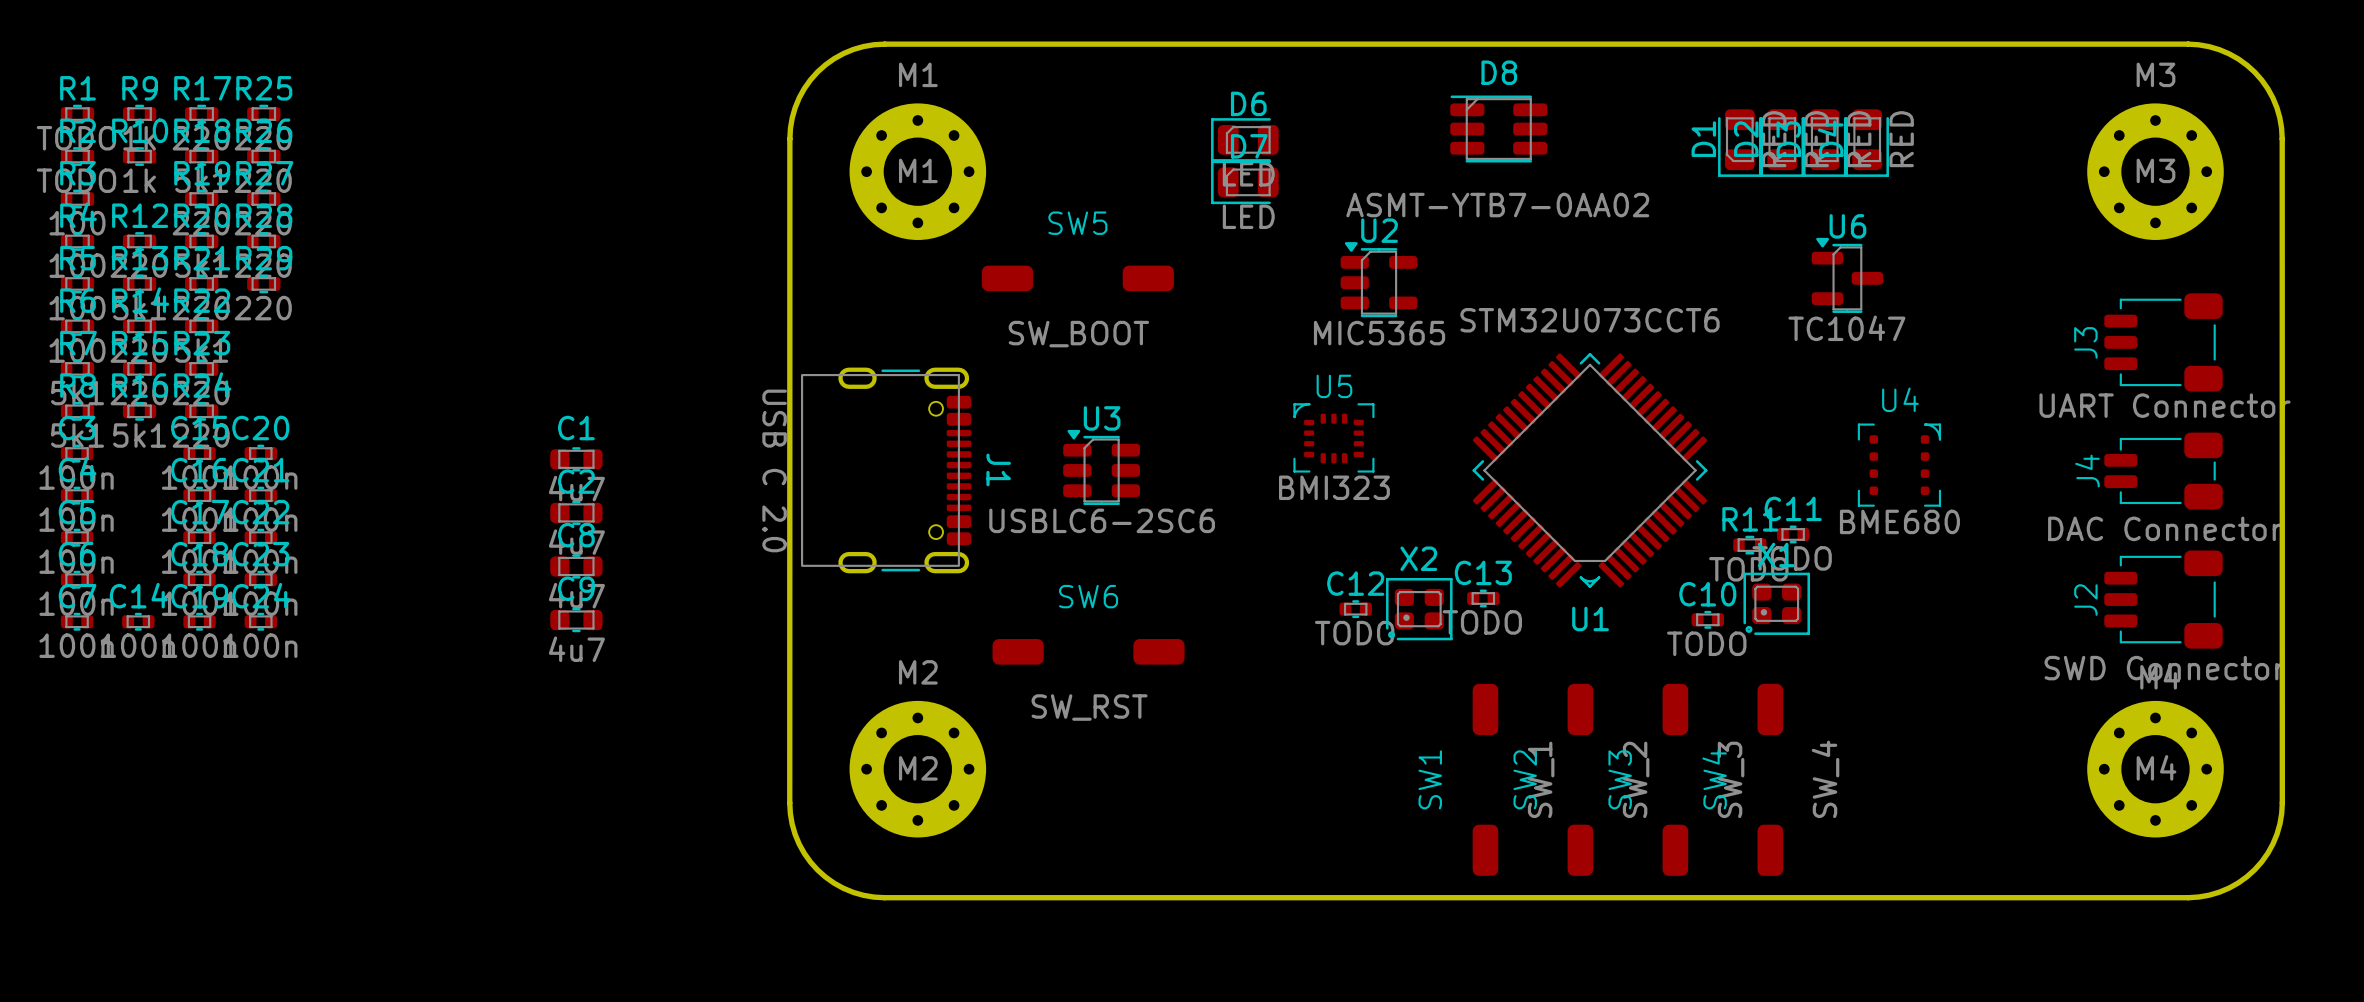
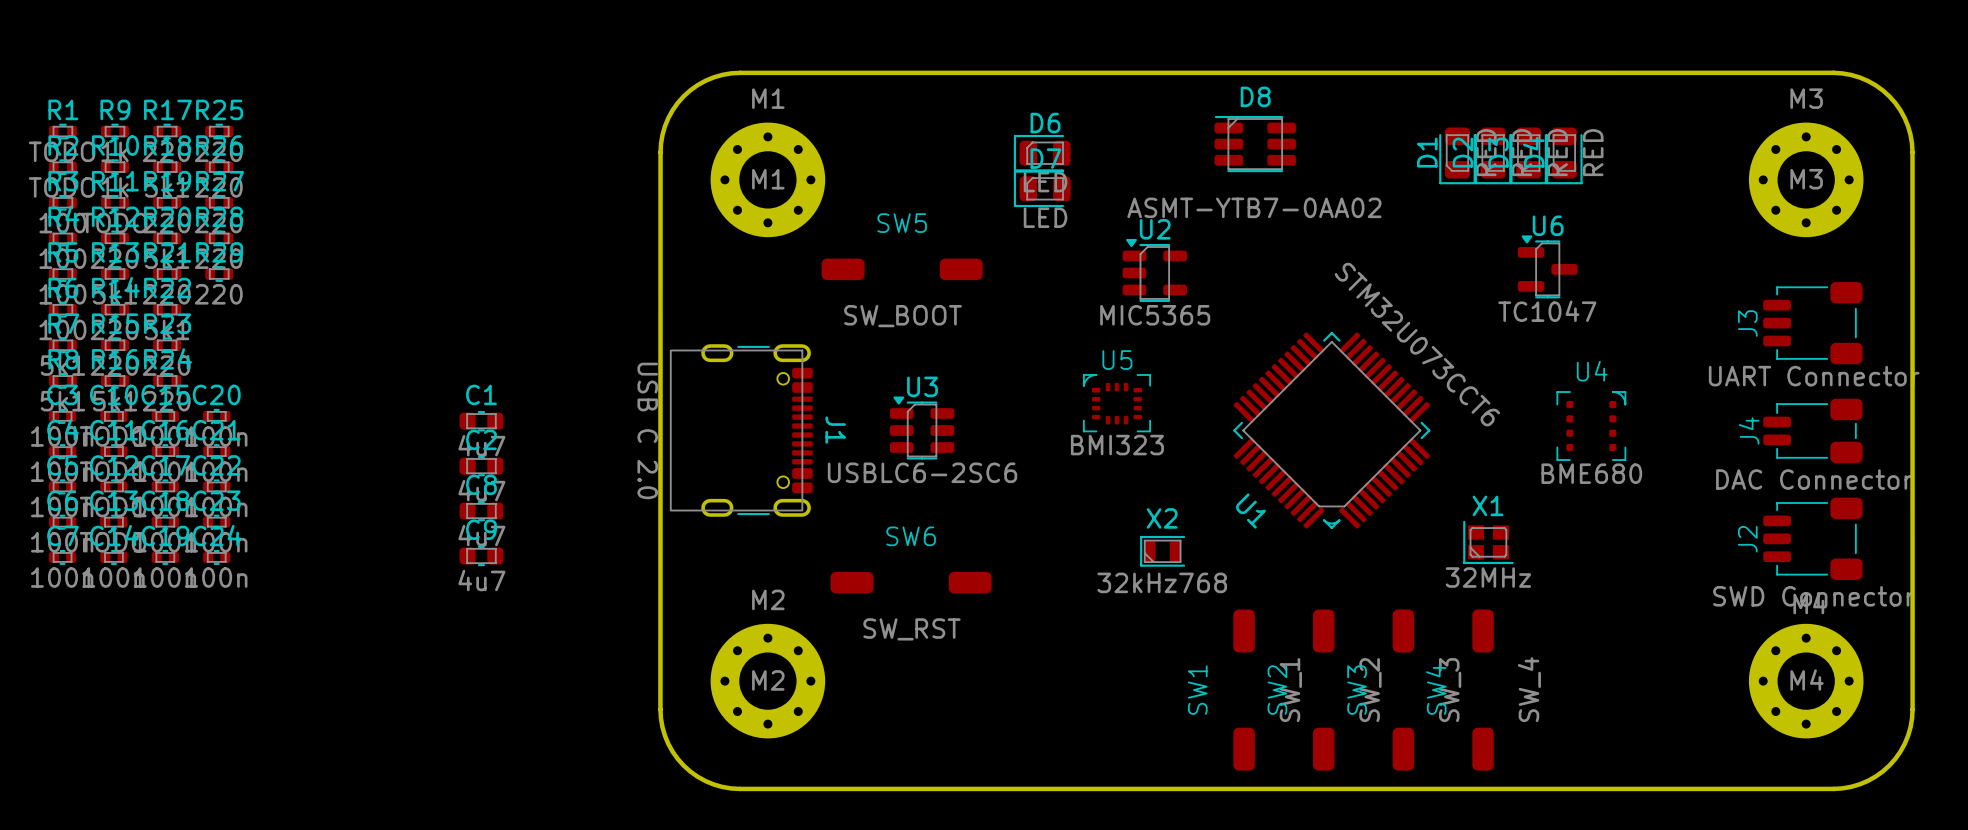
U1 value rotation: 0° (1590, 320) -> 45° clockwise (1417, 344)
C11 position: (1793, 534) -> (113, 451)
R11 position: (1749, 545) -> (115, 202)
X1 footprint: [1743, 572, 1811, 635] -> [1463, 520, 1514, 565]
X2 footprint: [1386, 577, 1453, 641] -> [1140, 535, 1186, 567]
C13 position: (1483, 598) -> (113, 522)
C12 position: (1355, 609) -> (113, 486)
U1 name rotation: 0° (1590, 619) -> 45° clockwise (1250, 511)
U1 name position: U1 (1590, 619) -> U1 (1250, 511)
C10 position: (1707, 619) -> (113, 416)
X1 value: none -> 32MHz (1488, 577)
X2 value: none -> 32kHz768 (1162, 582)

